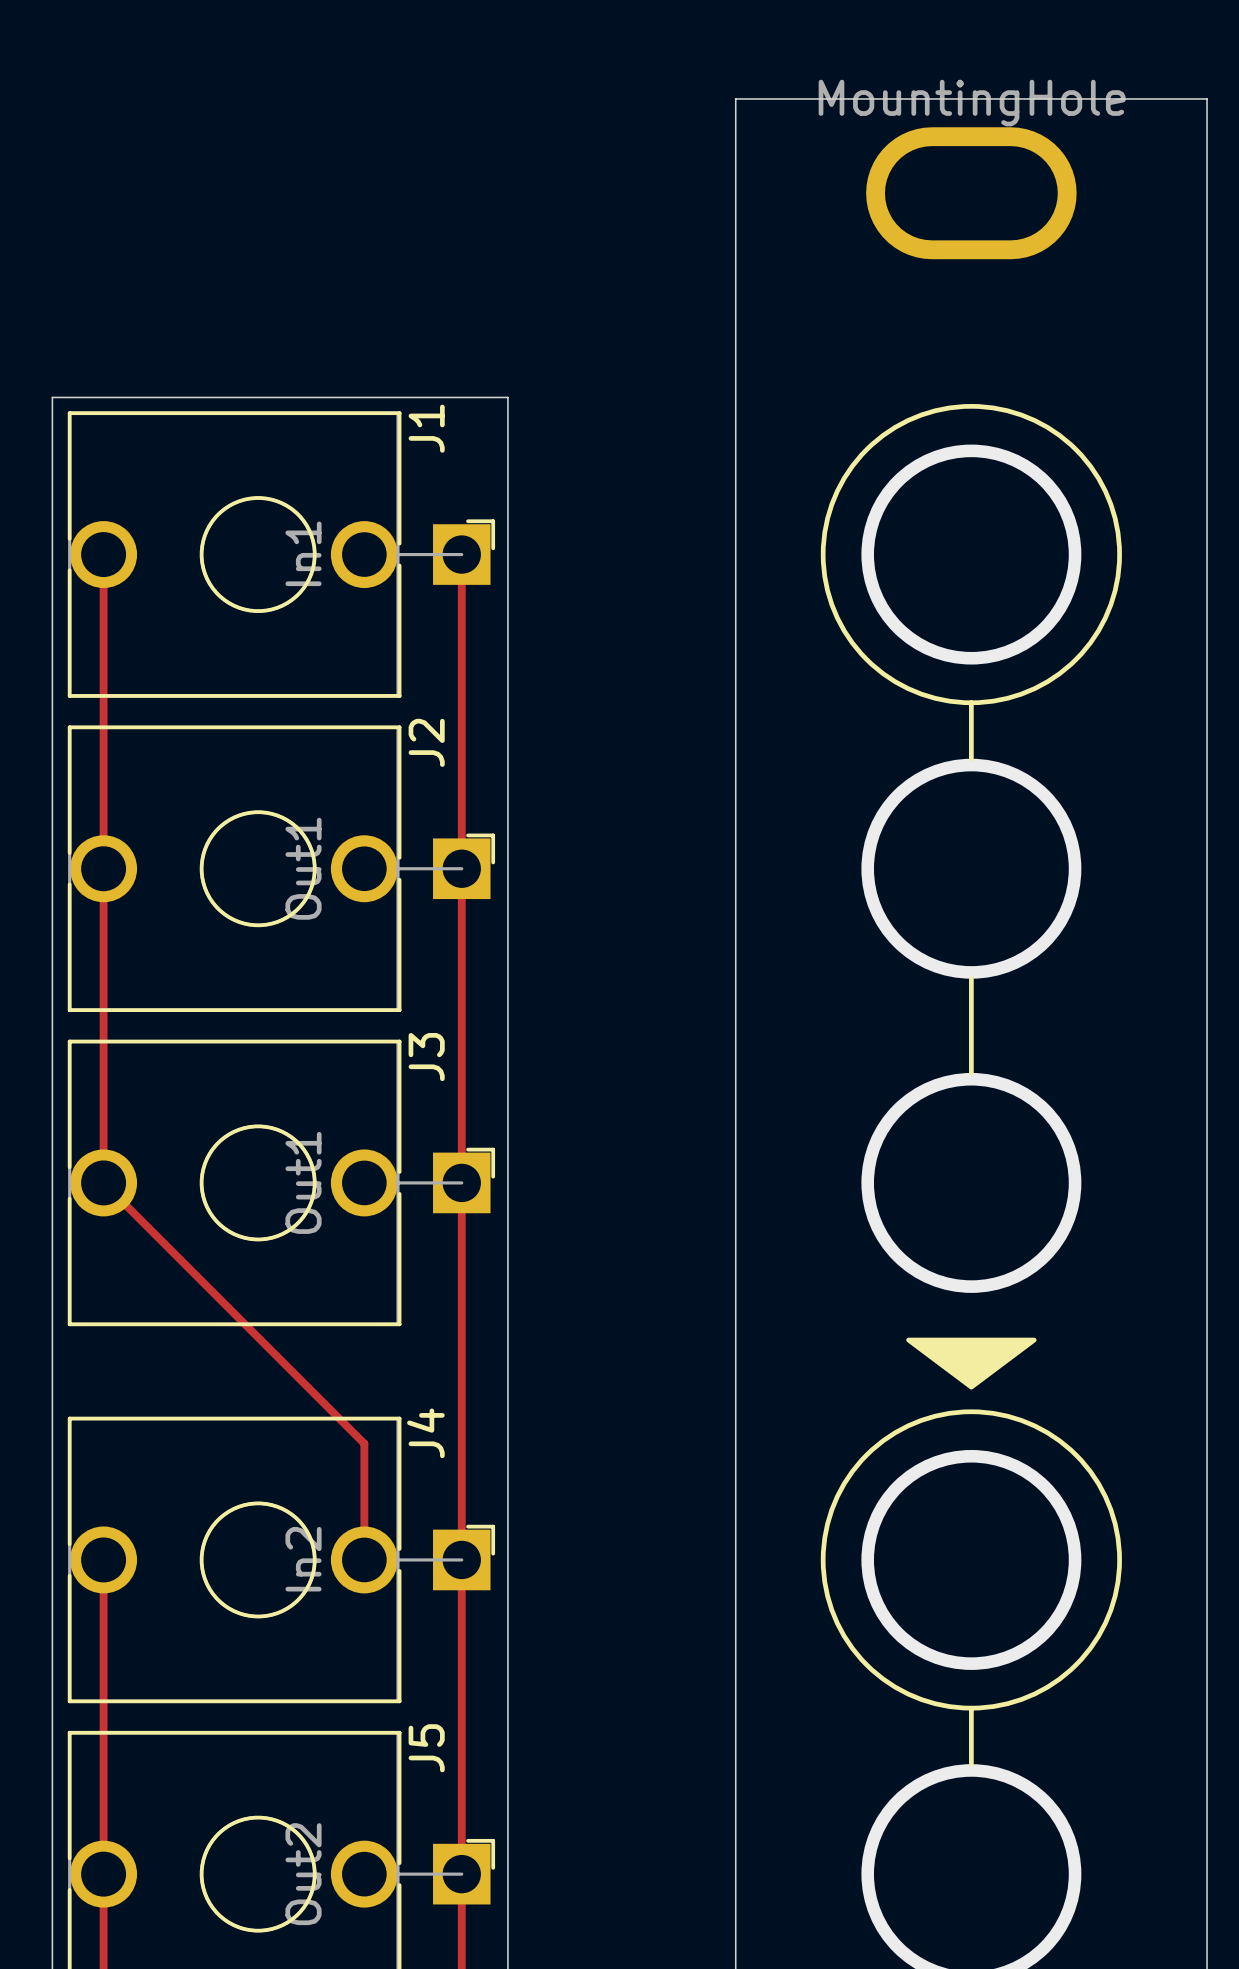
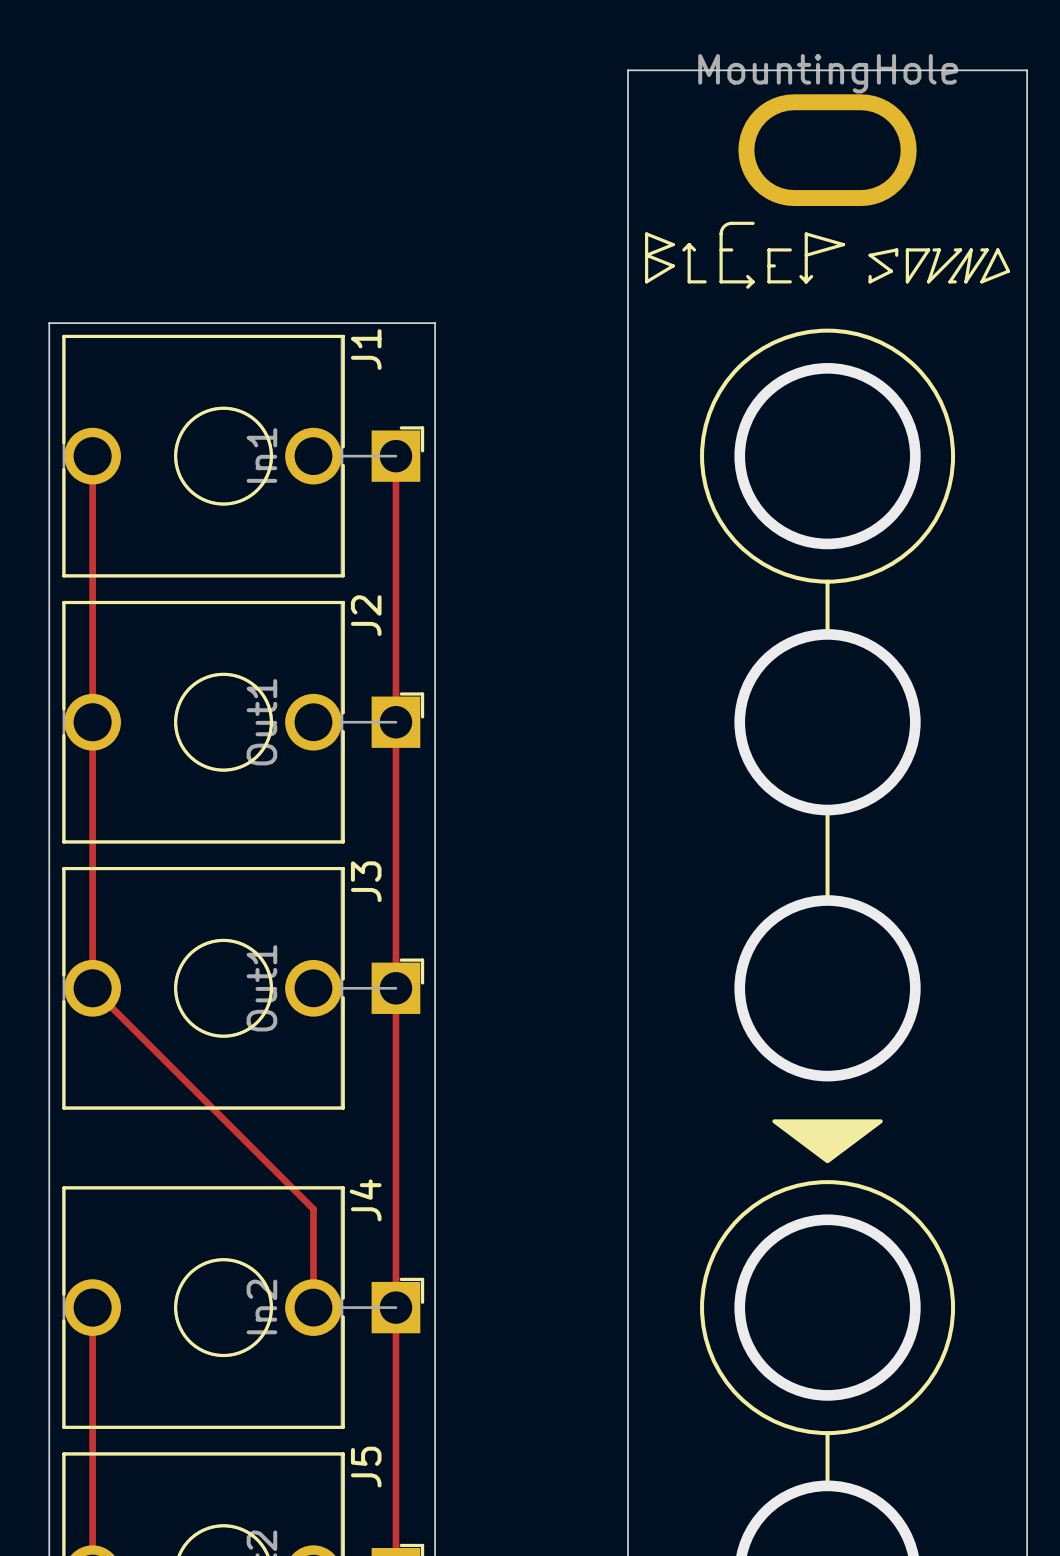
line: none -> (753, 223) (729, 223) (722, 229) (721, 281) (753, 281)
line: none -> (646, 233) (646, 281) (673, 265) (646, 255) (673, 244) (646, 233)
line: none -> (689, 244) (689, 281) (705, 281)
line: none -> (689, 244) (683, 249)
line: none -> (689, 244) (694, 249)
line: none -> (721, 249) (731, 249)
line: none -> (790, 249) (769, 249) (769, 281) (790, 281)
line: none -> (907, 249) (928, 249) (907, 281) (907, 249)
line: none -> (933, 249) (939, 249) (928, 281) (960, 249) (955, 249)
line: none -> (981, 249) (987, 249) (965, 281) (971, 249) (949, 281) (955, 281)
line: none -> (997, 249) (1008, 271) (981, 281) (997, 249)
line: none -> (806, 255) (843, 244) (806, 233) (806, 281)
line: none -> (896, 255) (896, 249) (870, 255) (891, 271) (870, 281) (870, 276)
line: none -> (769, 265) (774, 265)
line: none -> (747, 276) (753, 281)
line: none -> (800, 276) (806, 281)
line: none -> (811, 276) (806, 281)
line: none -> (753, 281) (747, 287)

